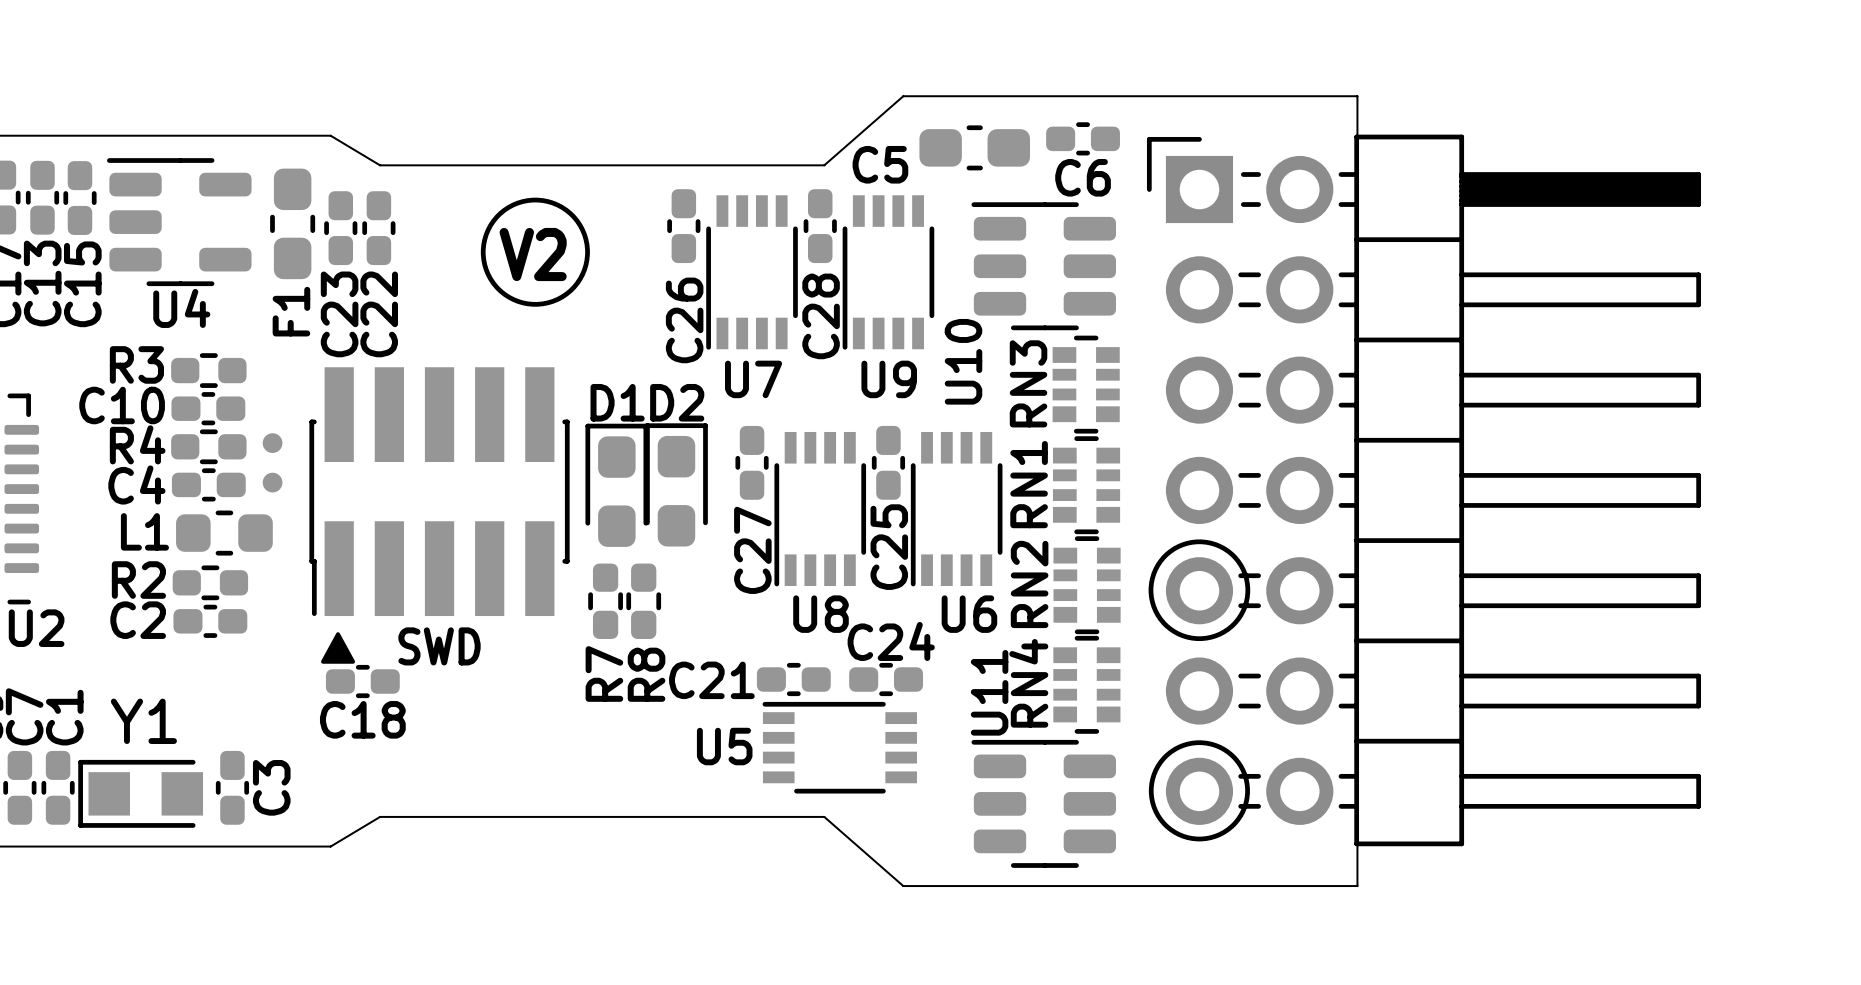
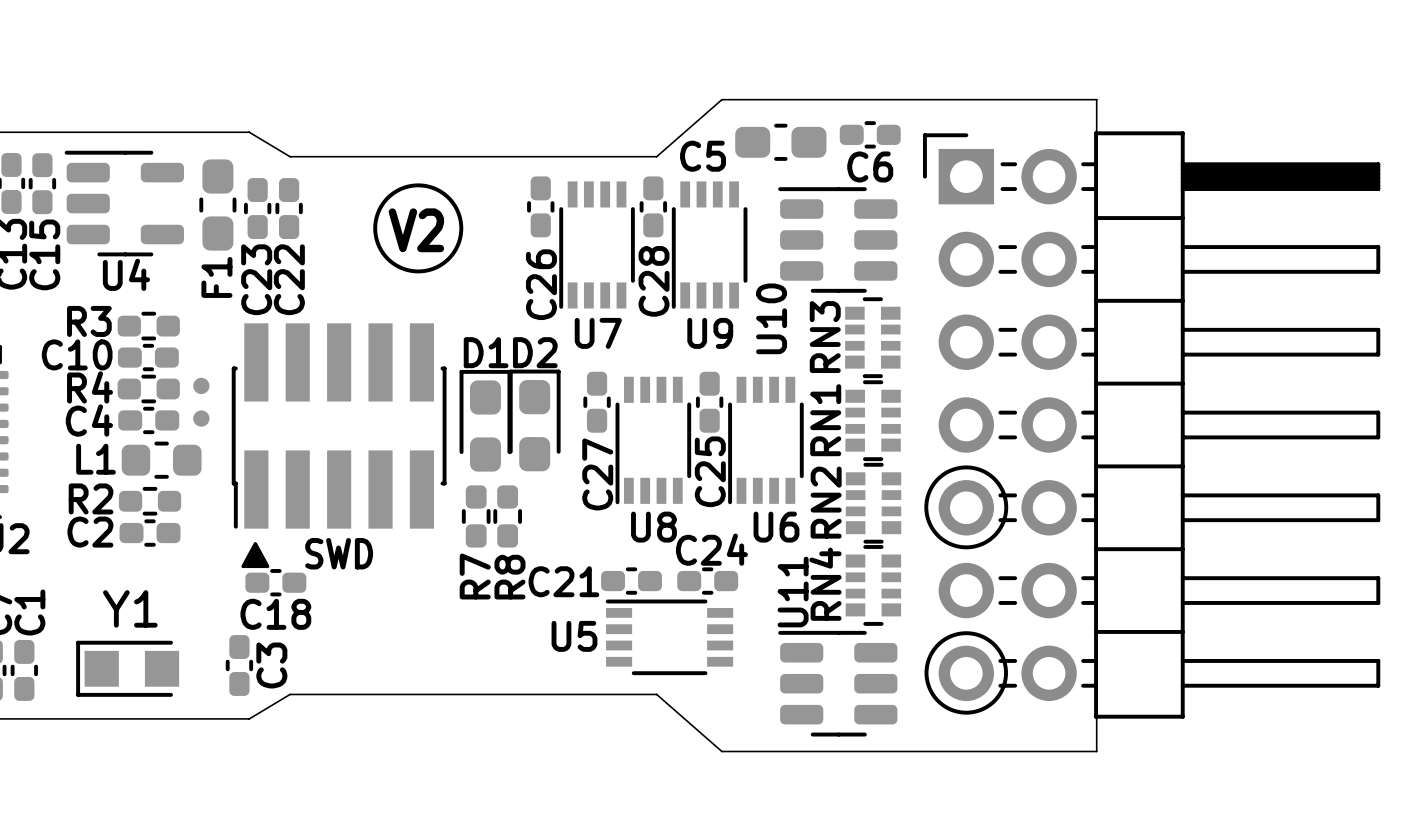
C3 position: (232, 787) -> (239, 665)
Y1 position: (140, 793) -> (127, 668)

